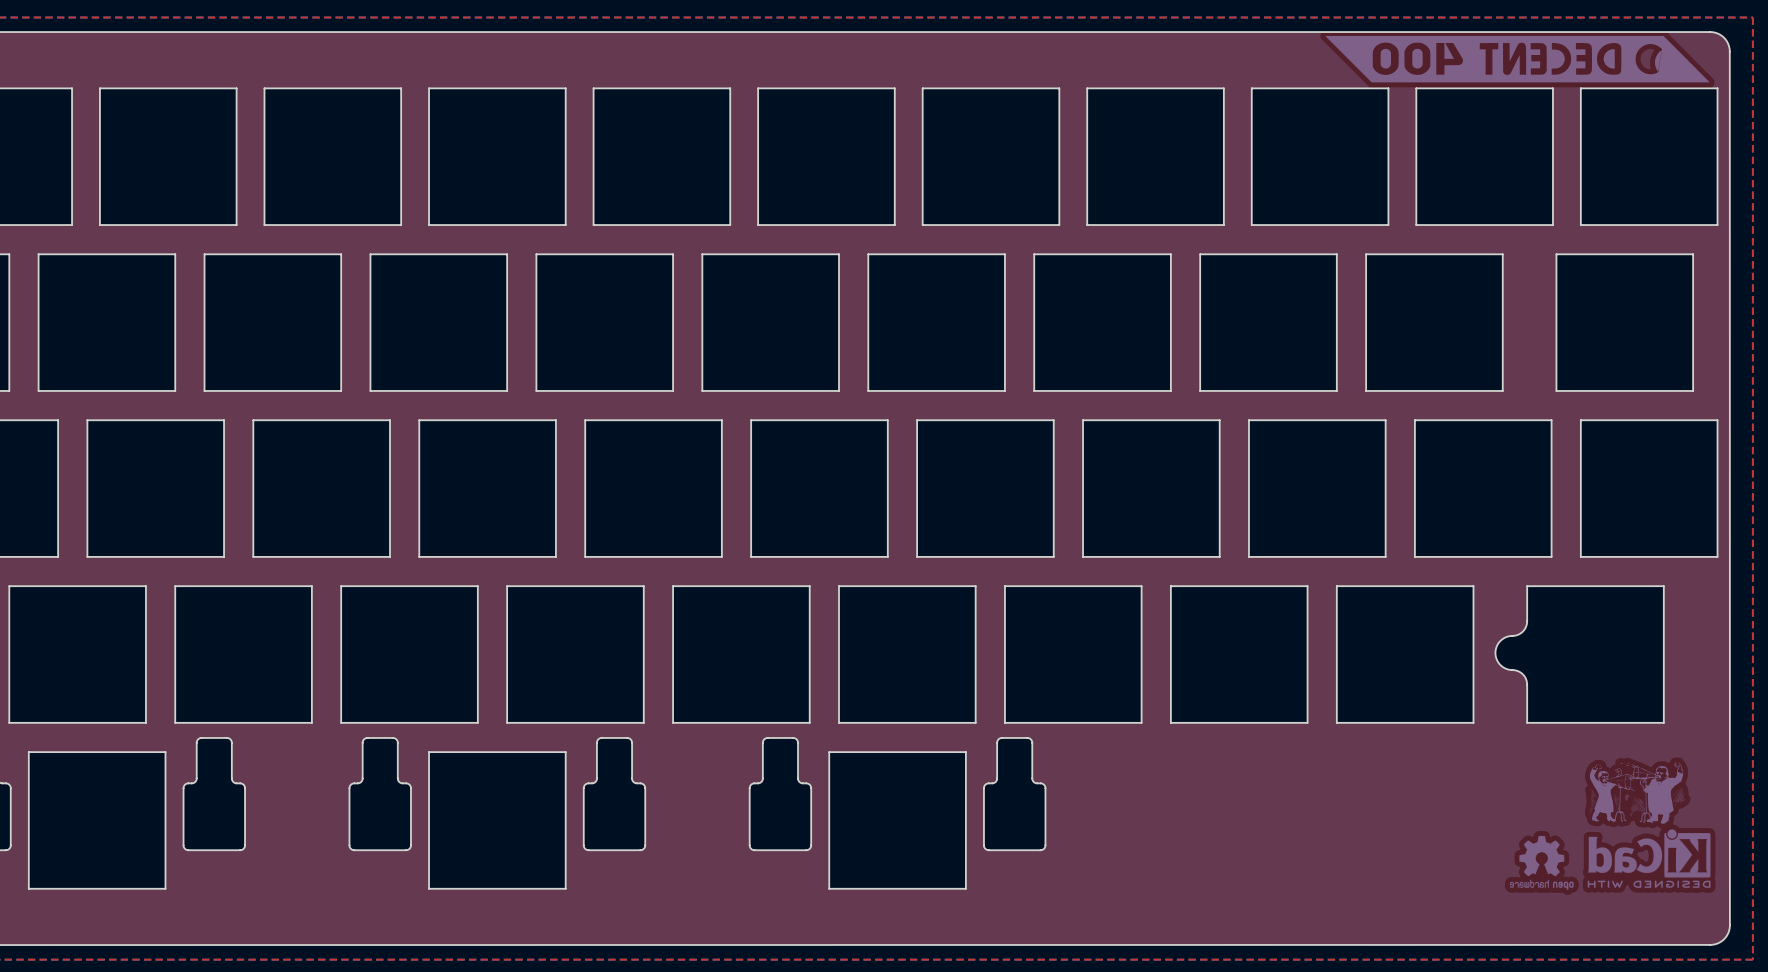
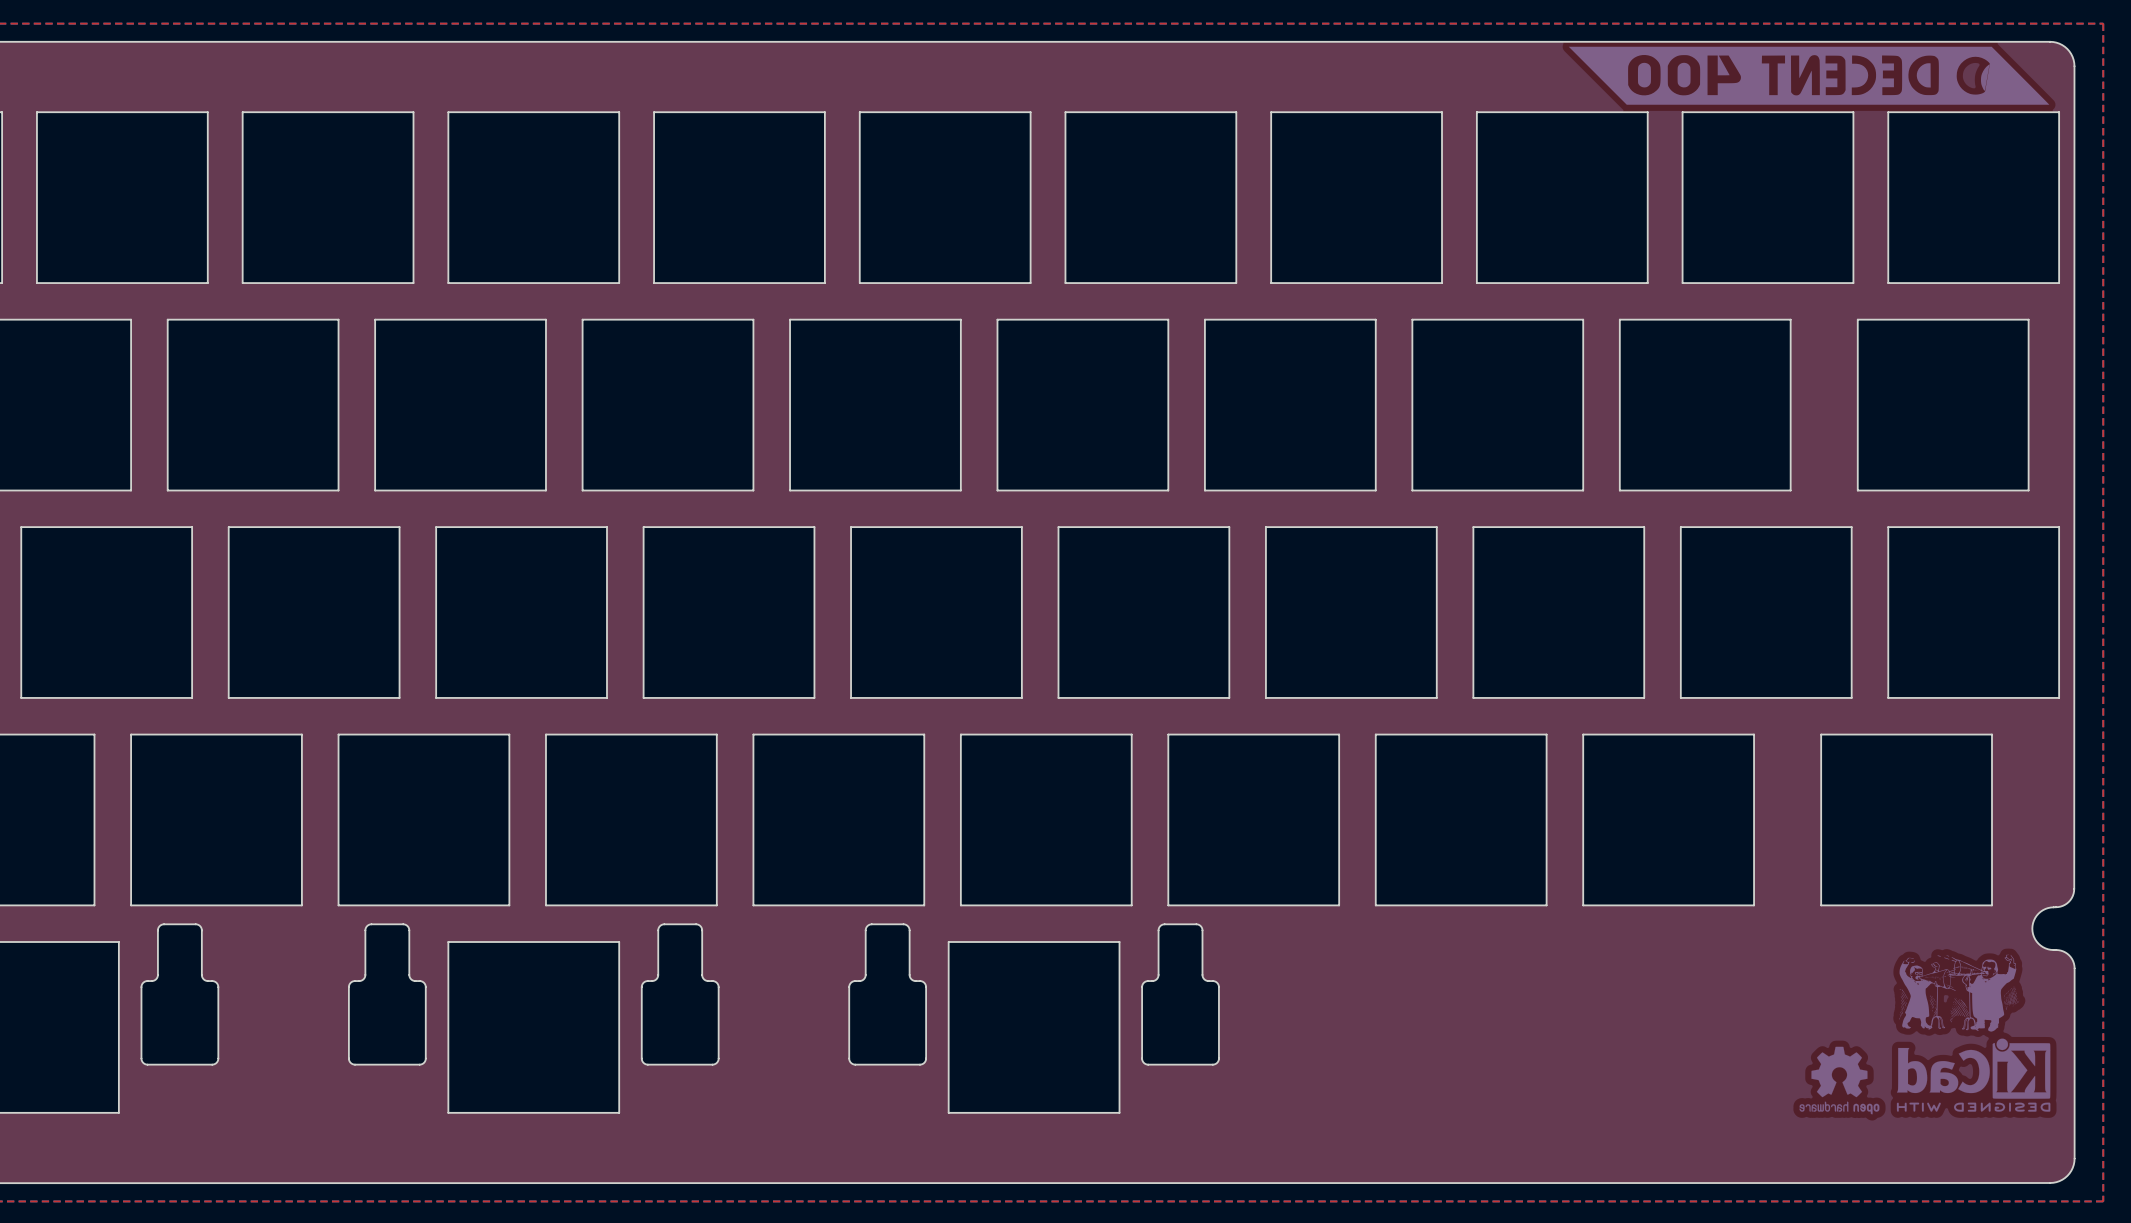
board edge: (1729, 51) (1729, 925) -> (2074, 66) (2074, 888) (2072, 895) (2067, 903) (2045, 908) (2038, 913) (2033, 920) (2032, 928) (2033, 936) (2038, 943) (2048, 949) (2065, 952) (2072, 959) (2074, 965) (2074, 1158)
drawing: none -> [1820, 733, 1993, 907]
board edge: (1527, 586) (1526, 626) (1519, 633) (1501, 640) (1495, 652) (1501, 665) (1519, 672) (1526, 679) (1527, 722) (1663, 722) (1663, 586) (1527, 586) -> none

